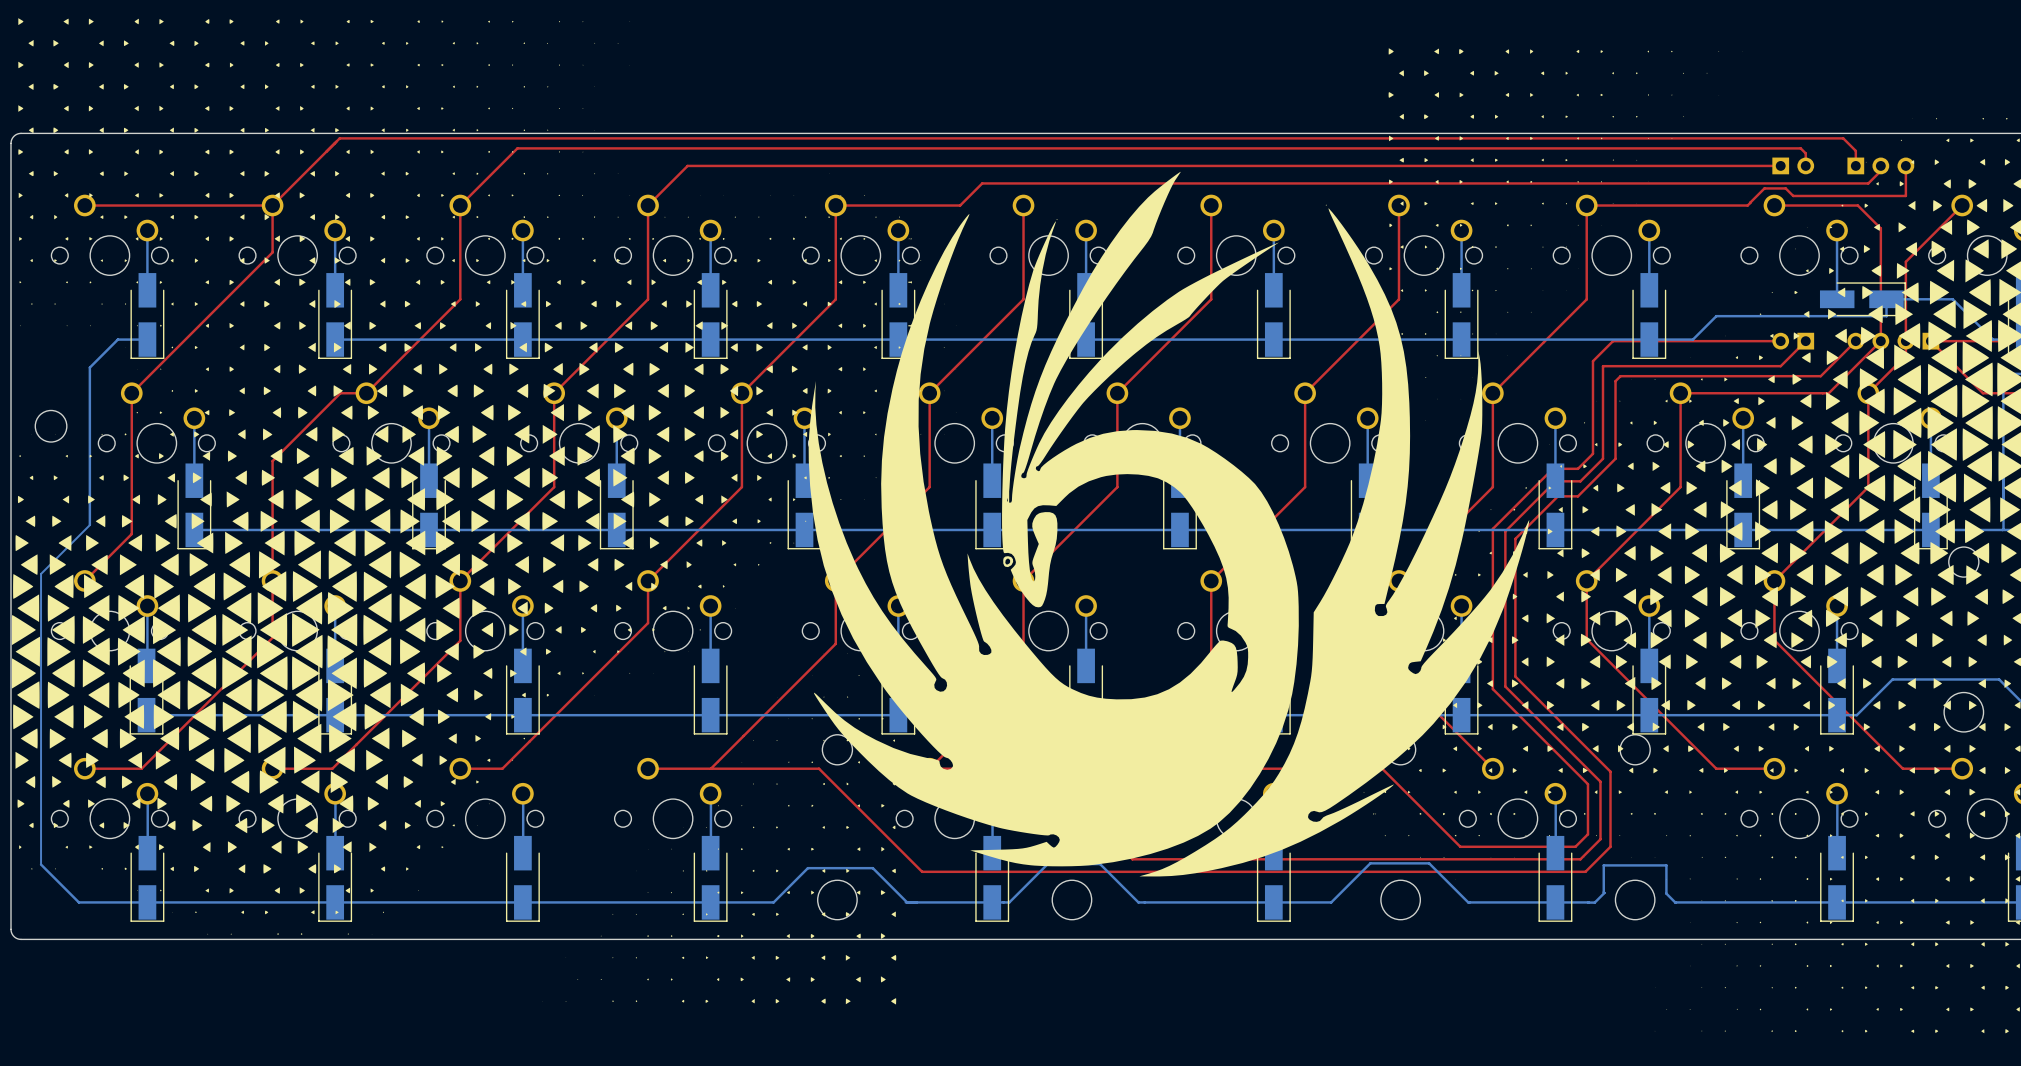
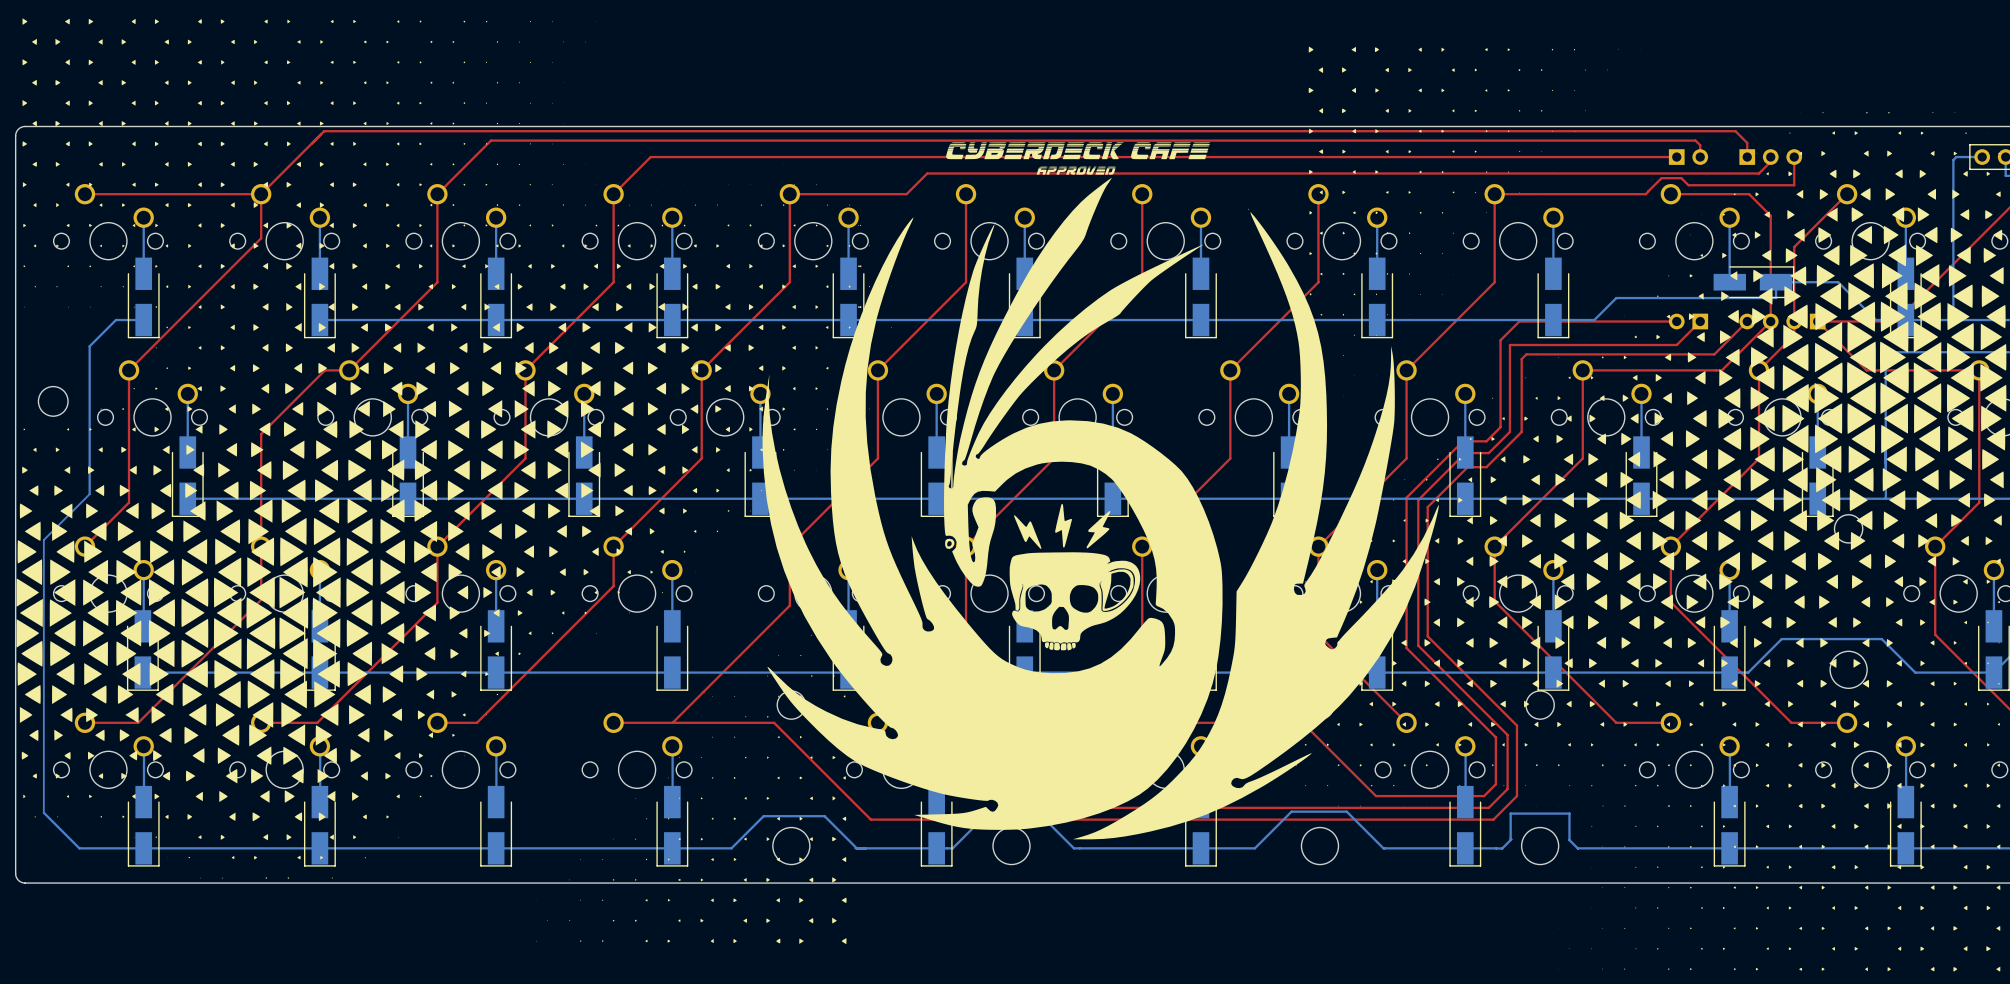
drawing: none -> [946, 142, 1211, 175]
drawing position: (1168, 524) -> (1100, 508)
drawing: none -> [1009, 503, 1141, 651]

